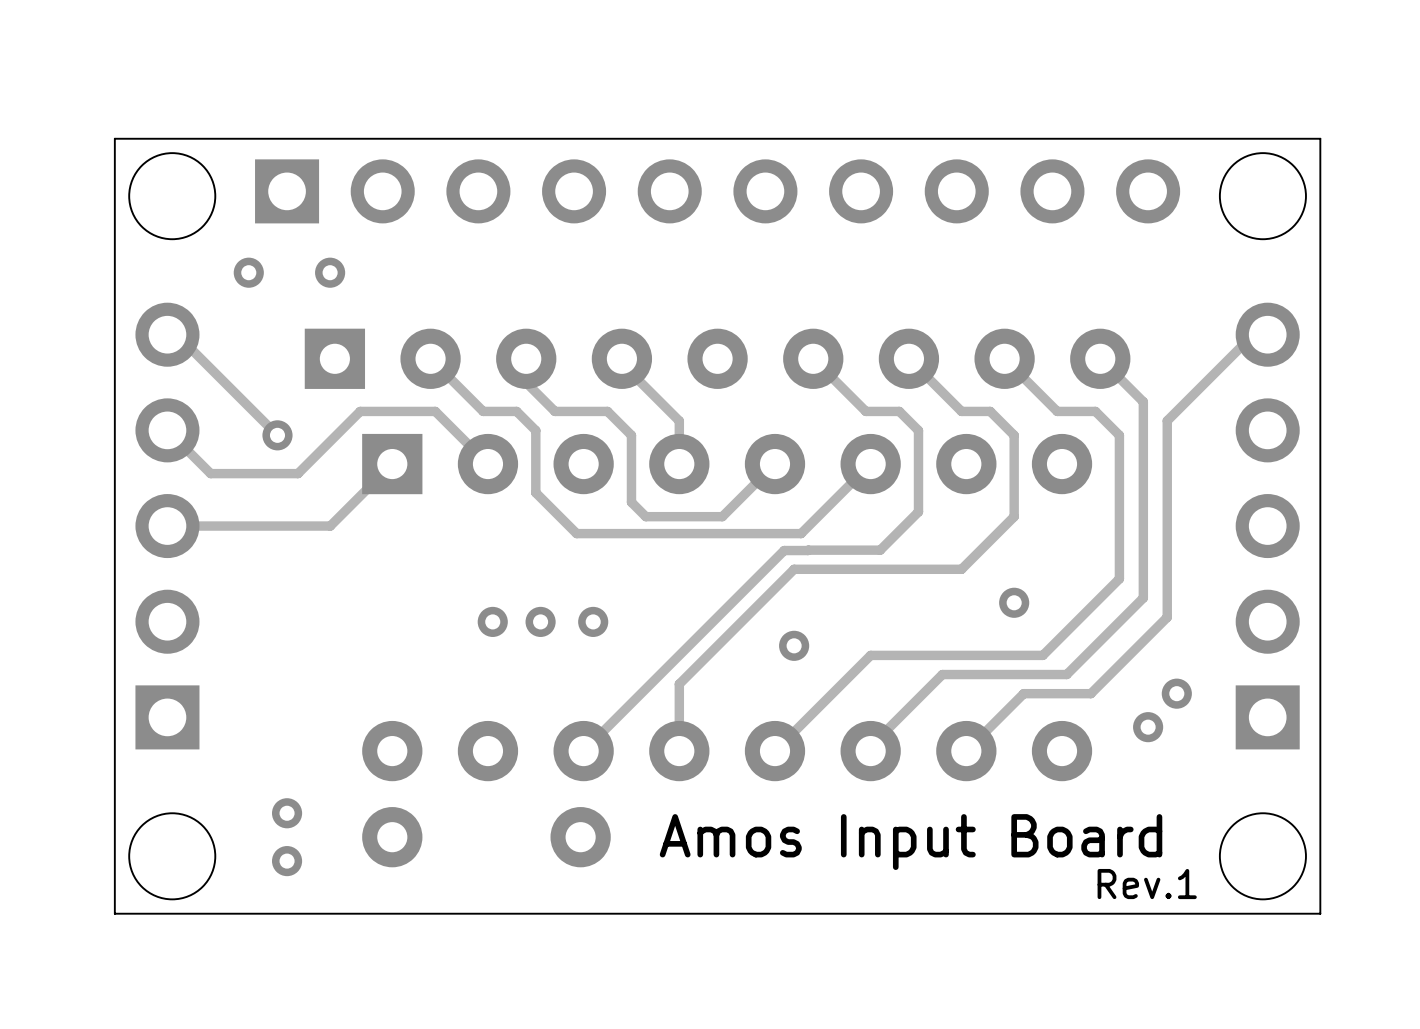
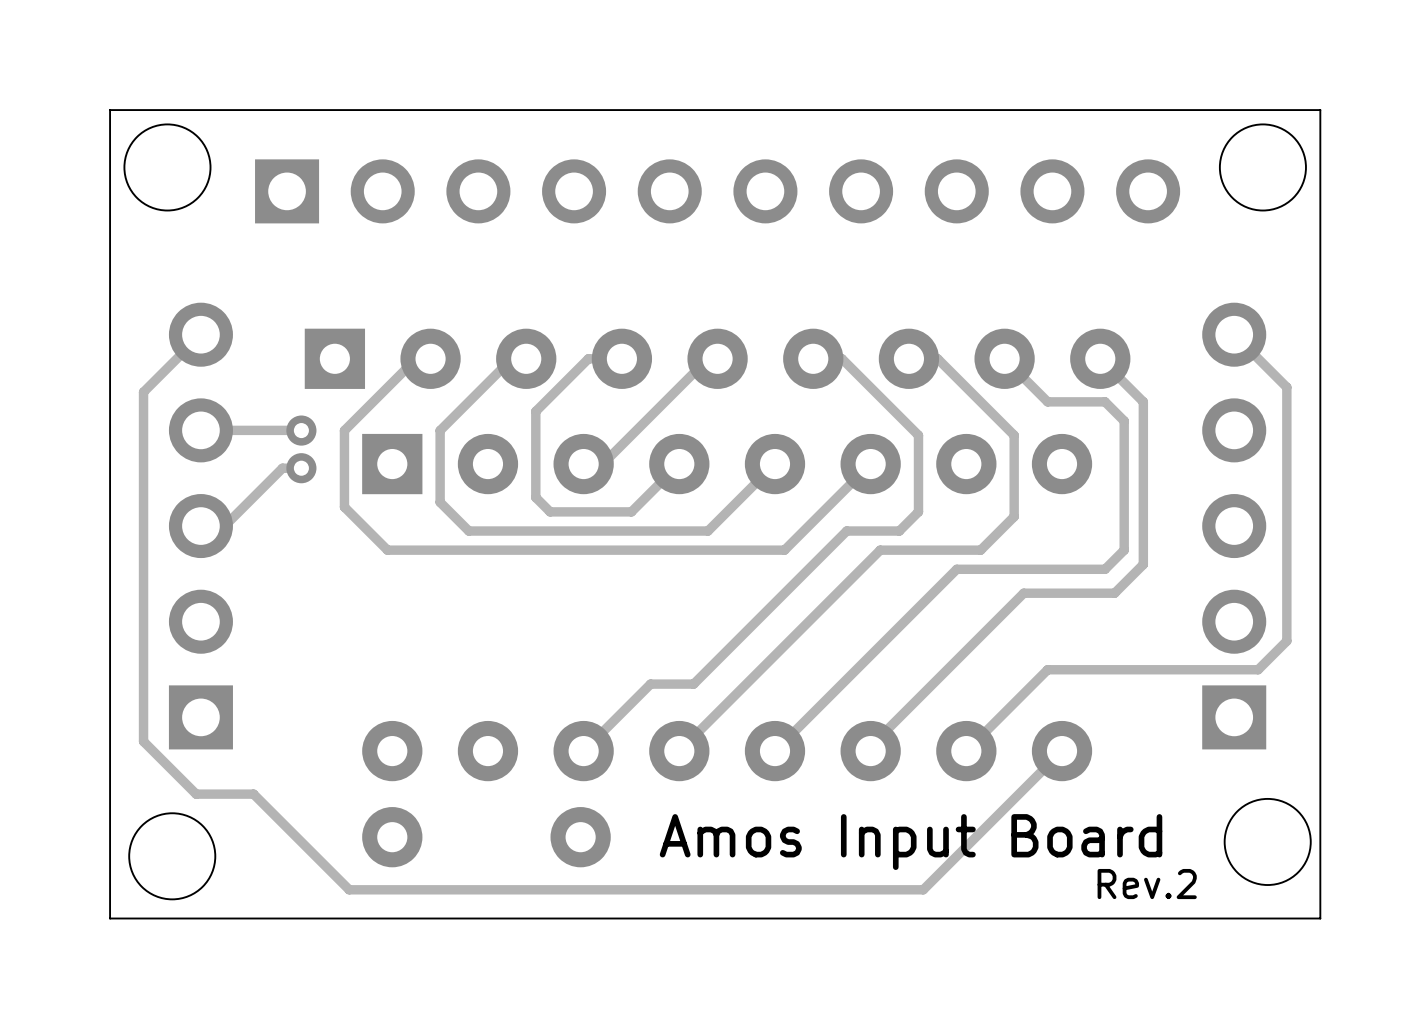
board edge: (1320, 138) (114, 138) (114, 913) (1320, 913) -> (1320, 138) (1320, 110) (110, 110) (110, 918) (1320, 918) (1320, 913)
round board edge position: (172, 196) -> (167, 167)
round board edge position: (1262, 196) -> (1262, 167)
via: (248, 272) -> none
via: (330, 272) -> none
track: (167, 334) (176, 334) (277, 435) -> none
track: none -> (200, 334) (143, 392) (143, 741) (196, 794) (253, 794) (349, 889) (923, 889) (1062, 751)
track: (1267, 334) (1253, 334) (1167, 420) (1167, 617) (1090, 693) (1023, 693) -> (1234, 334) (1286, 387) (1286, 641) (1258, 669) (1047, 669) (1023, 693)
track: (430, 358) (483, 411) (516, 411) (535, 430) -> (430, 358) (416, 358) (344, 430) (344, 507) (387, 550) (784, 550) (801, 533)
track: (526, 358) (526, 382) (554, 411) (607, 411) (631, 435) (631, 502) (645, 516) (722, 516) -> (526, 358) (511, 358) (440, 430) (440, 502) (468, 531) (708, 531) (722, 516)
track: (621, 358) (621, 363) (679, 421) (679, 464) -> (621, 358) (588, 358) (535, 411) (535, 430)
track: none -> (717, 358) (708, 358) (602, 464) (583, 464)
track: (813, 358) (865, 411) (899, 411) (918, 430) (918, 435) -> (813, 358) (841, 358) (918, 435)
track: (908, 358) (961, 411) (990, 411) -> (908, 358) (937, 358) (990, 411)
track: (1047, 401) (1057, 411) (1095, 411) (1119, 435) (1119, 578) (1042, 655) (870, 655) -> (1047, 401) (1105, 401) (1124, 421) (1124, 550) (1105, 569) (961, 569)
track: (167, 430) (210, 473) (298, 473) (360, 411) (435, 411) (487, 464) -> none
track: none -> (301, 430) (200, 430)
via position: (277, 435) -> (301, 430)
track: (392, 464) (330, 526) (224, 526) -> (301, 468) (282, 468) (224, 526)
via: none -> (301, 468)
track: (535, 492) (576, 533) (801, 533) -> (535, 492) (535, 497) (550, 511) (631, 511) (679, 464)
part position: (167, 526) -> (200, 526)
part position: (1267, 526) -> (1234, 526)
track: (899, 531) (880, 550) (808, 550) -> none
track: (808, 550) (784, 550) (650, 684) -> (899, 531) (846, 531) (693, 684) (650, 684)
track: (980, 550) (961, 569) -> none
track: (1143, 564) (1143, 597) (1066, 674) (942, 674) -> (1143, 564) (1114, 593) (1023, 593) (942, 674)
track: (956, 569) (794, 569) (679, 684) (679, 751) -> (980, 550) (880, 550) (679, 751)
track: none -> (956, 569) (870, 655)
via: (1014, 602) -> none
via: (492, 621) -> none
via: (540, 621) -> none
via: (593, 621) -> none
via: (794, 645) -> none
via: (1176, 693) -> none
via: (1148, 727) -> none
via: (287, 813) -> none
round board edge position: (1262, 856) -> (1267, 841)
via: (287, 861) -> none
text: Rev.1 (1147, 884) -> Rev.2 (1147, 884)

